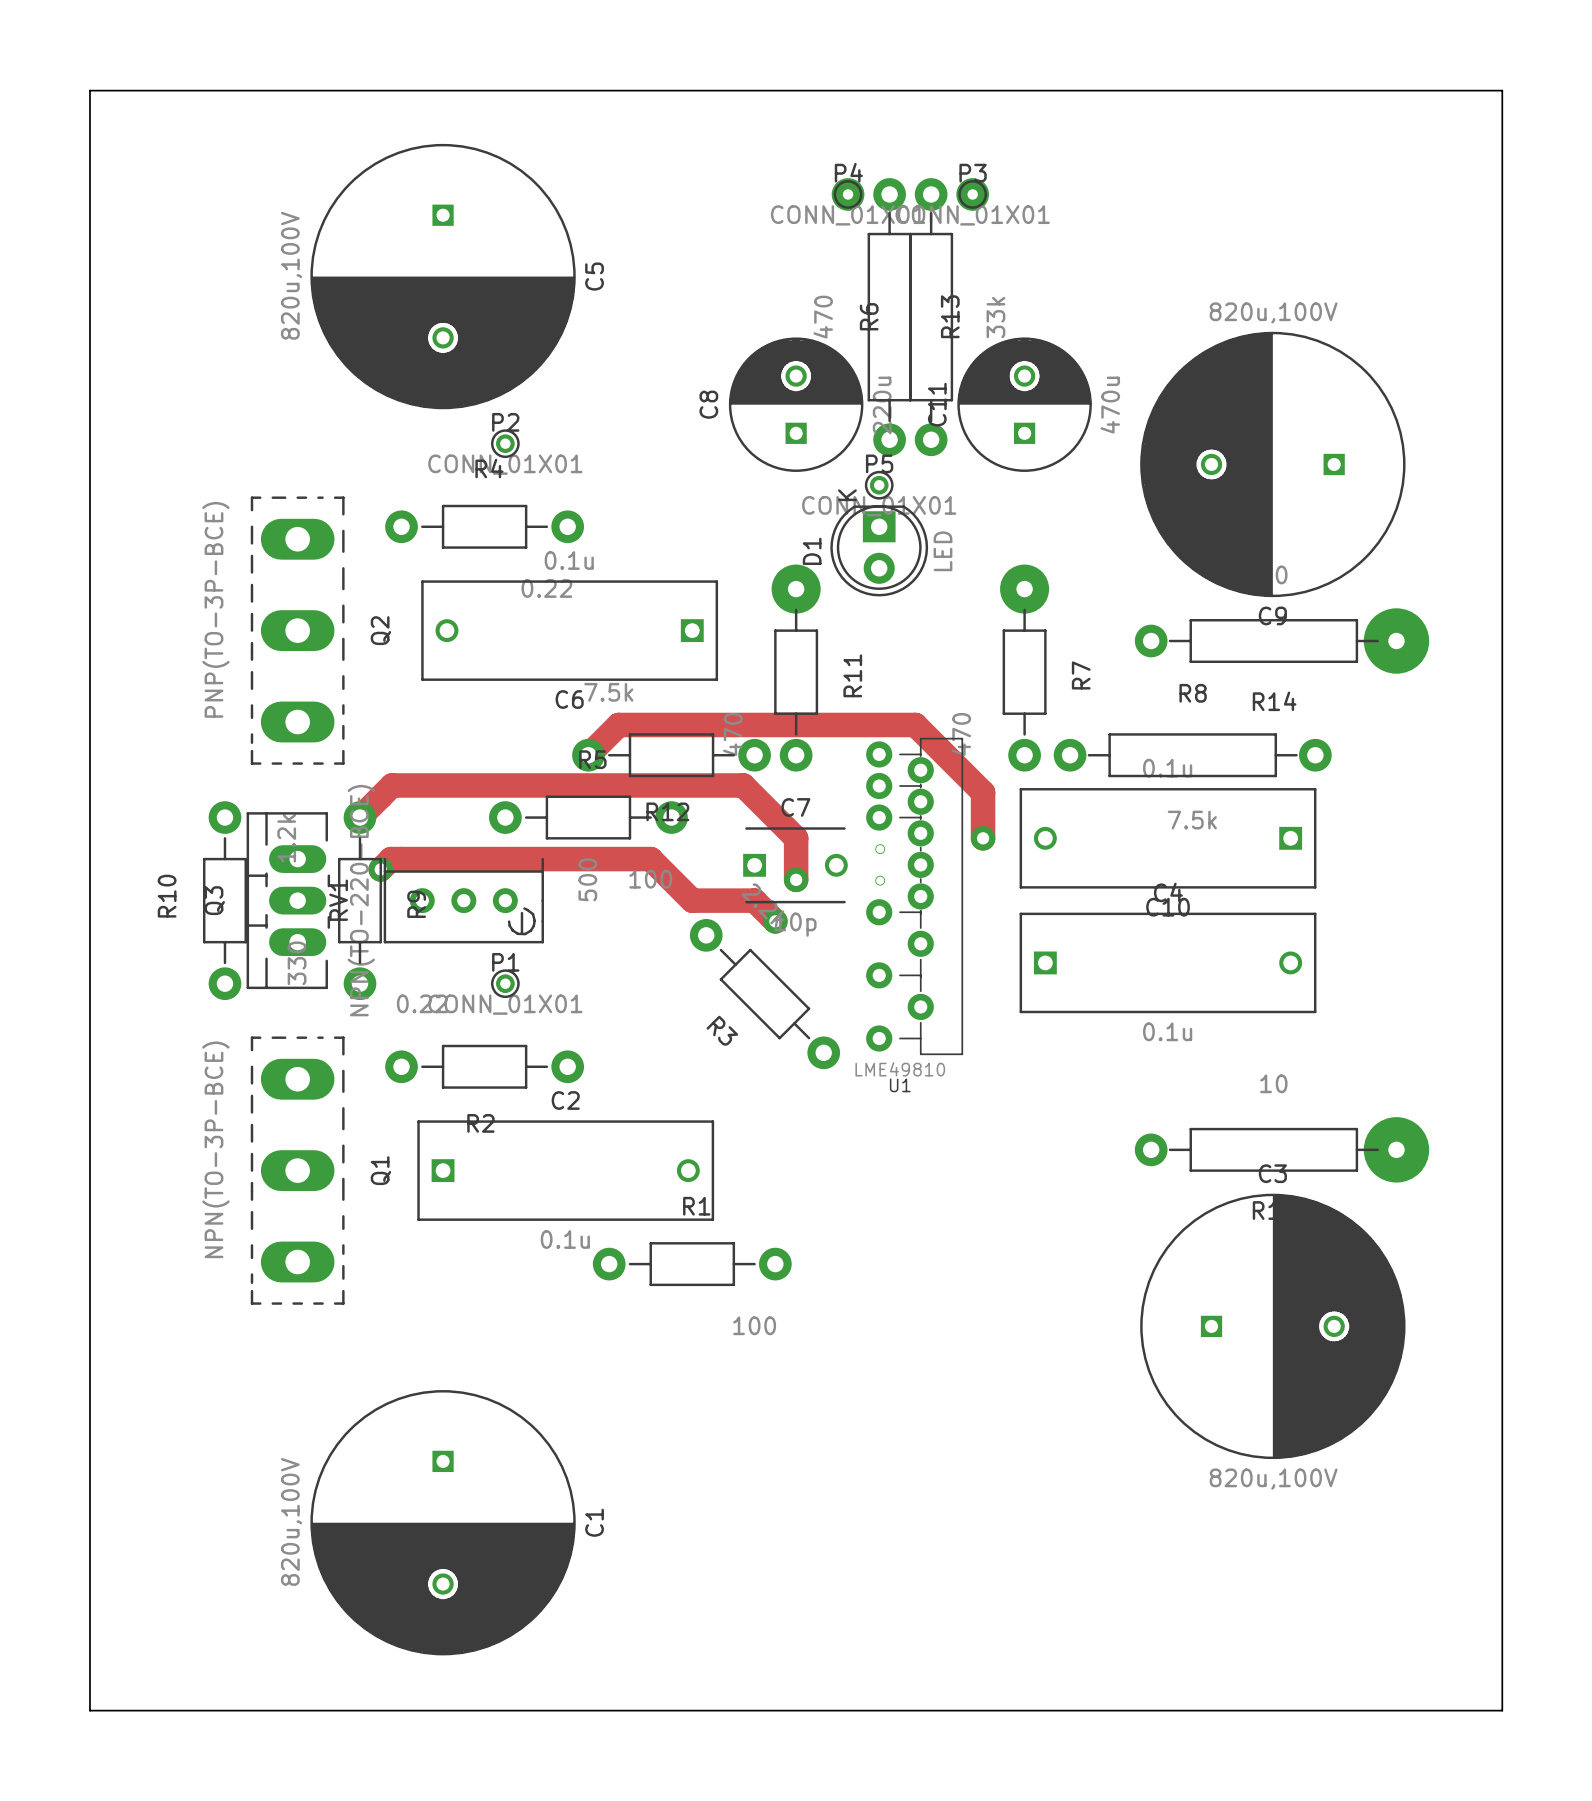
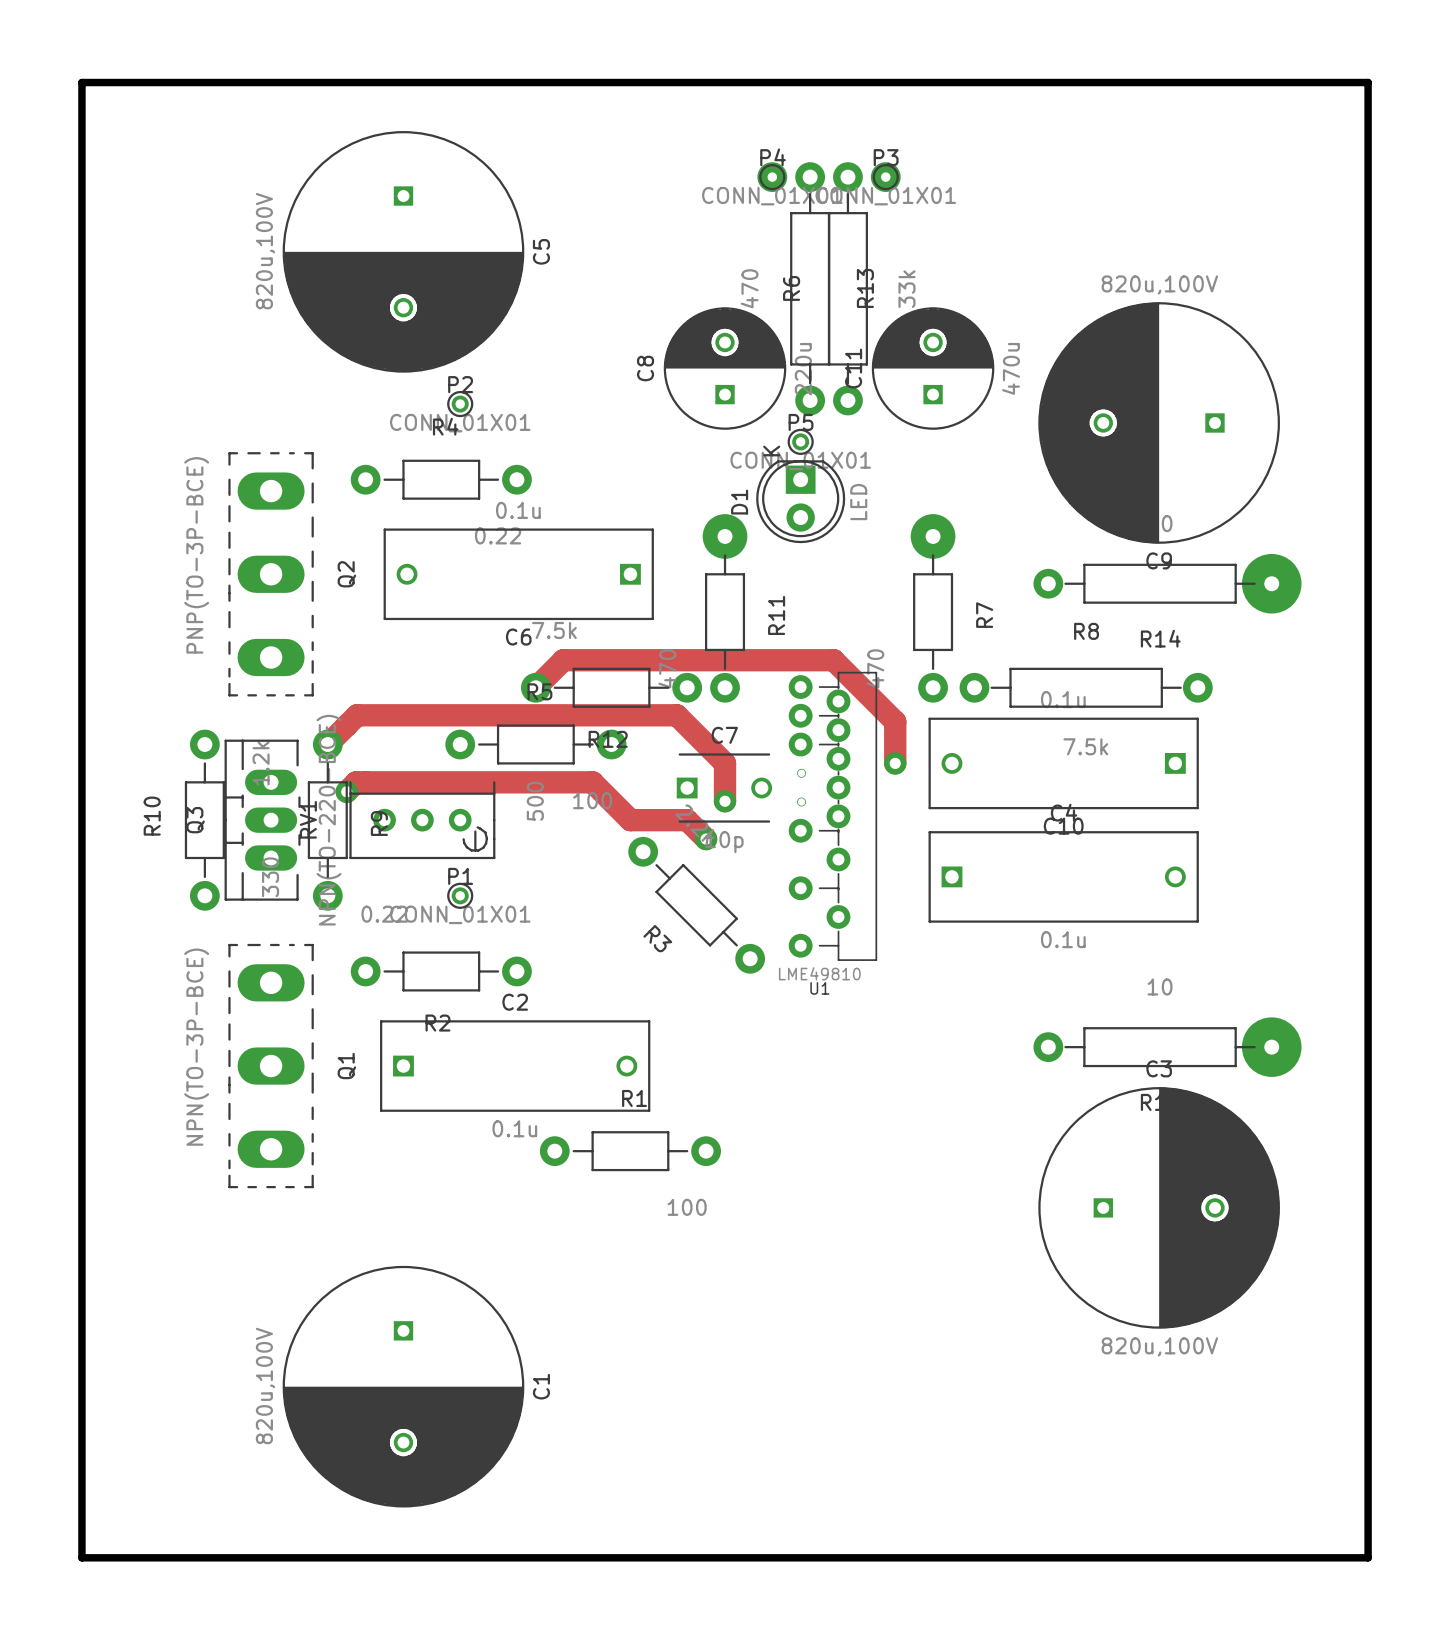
board edge width: thin (89, 90) (89, 1710) (1502, 1710) (1502, 90) (89, 90) -> thick (81, 82) (81, 1557) (1368, 1557) (1368, 82) (81, 82)

